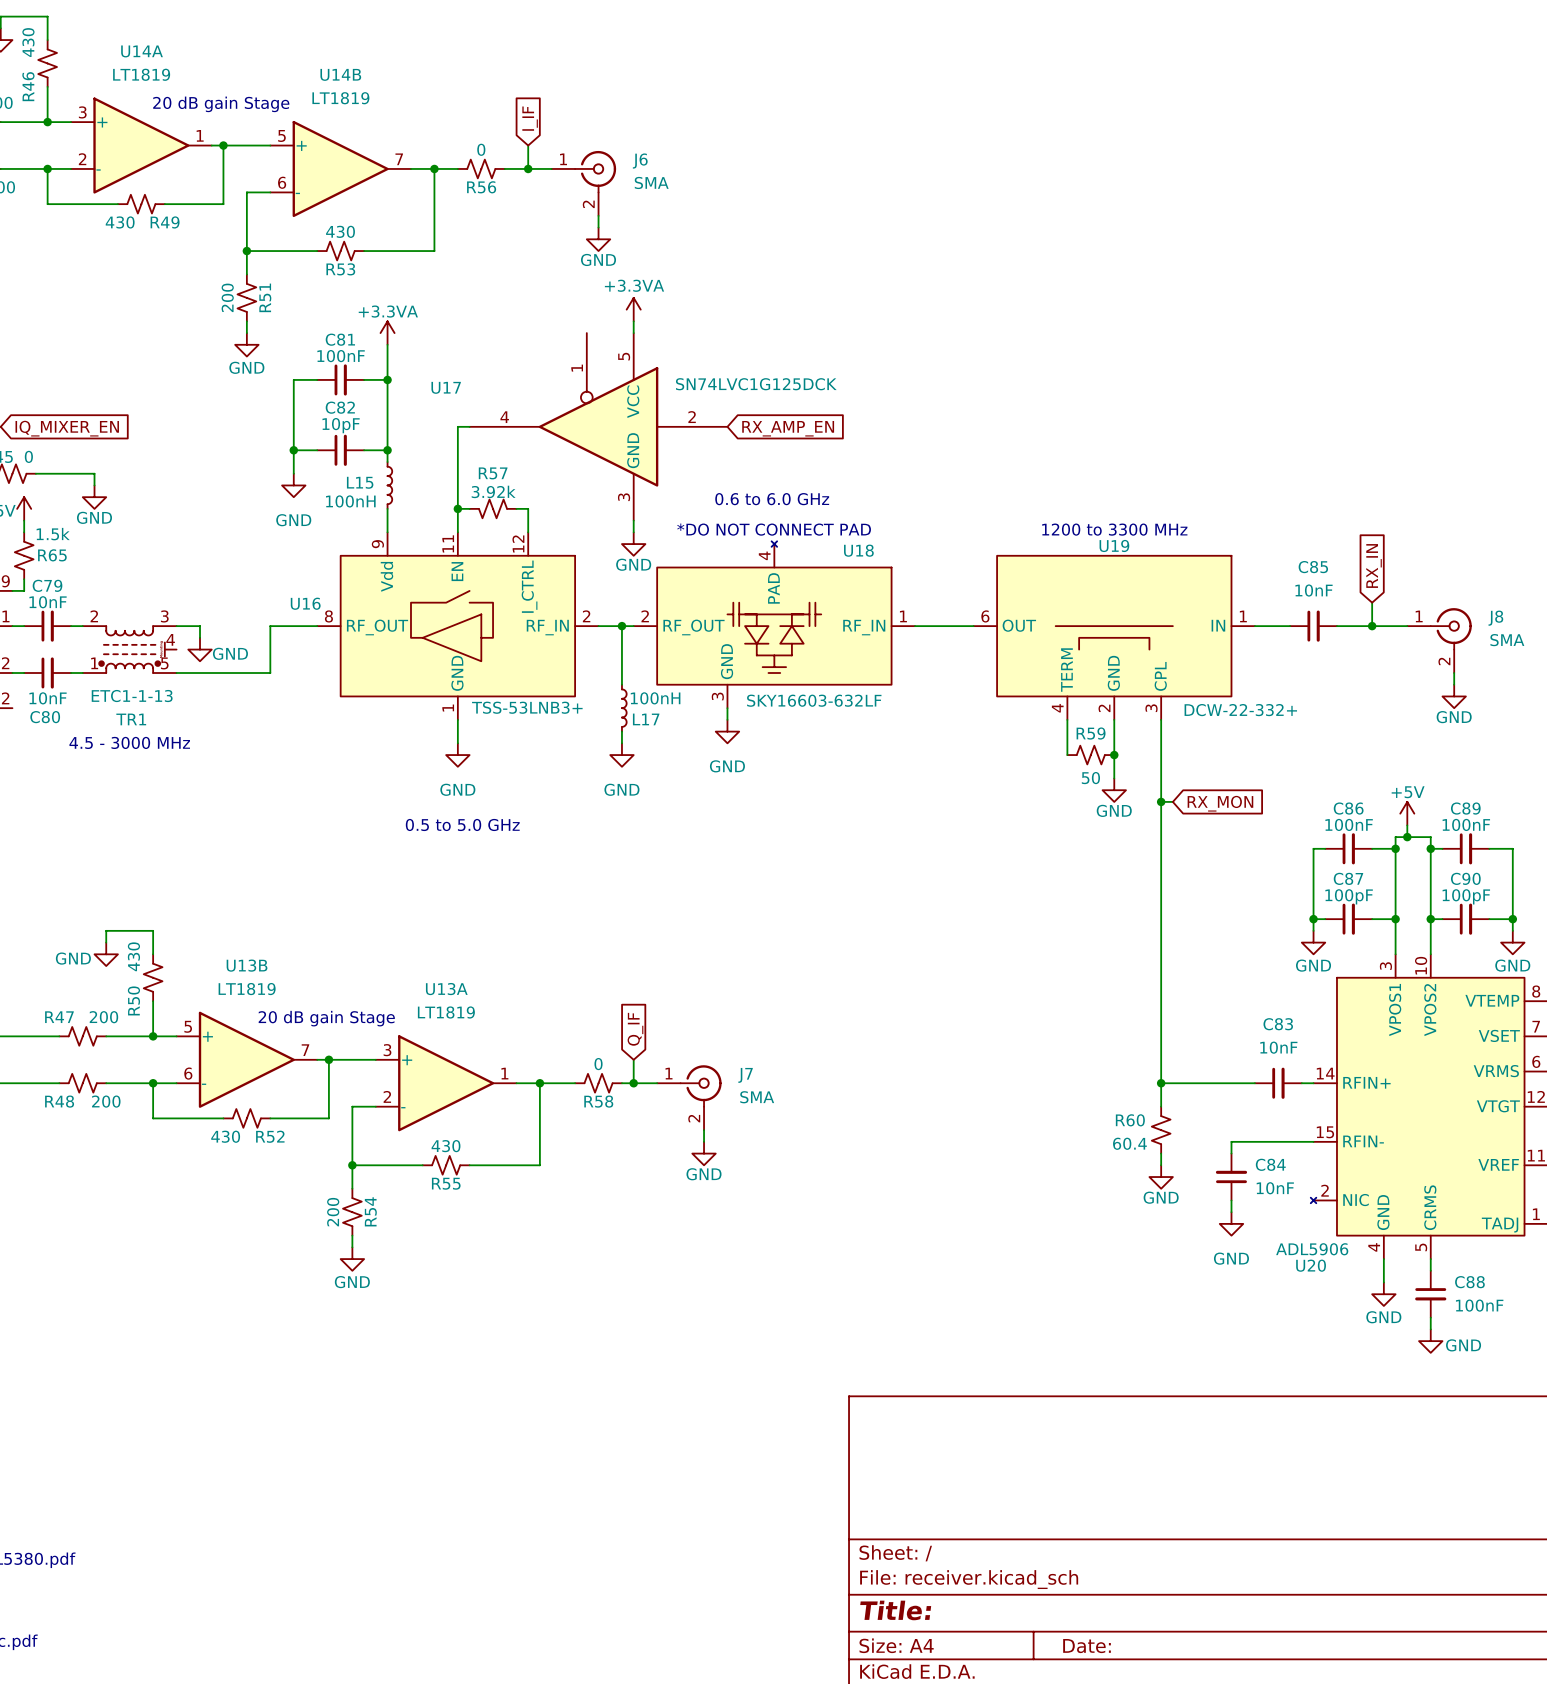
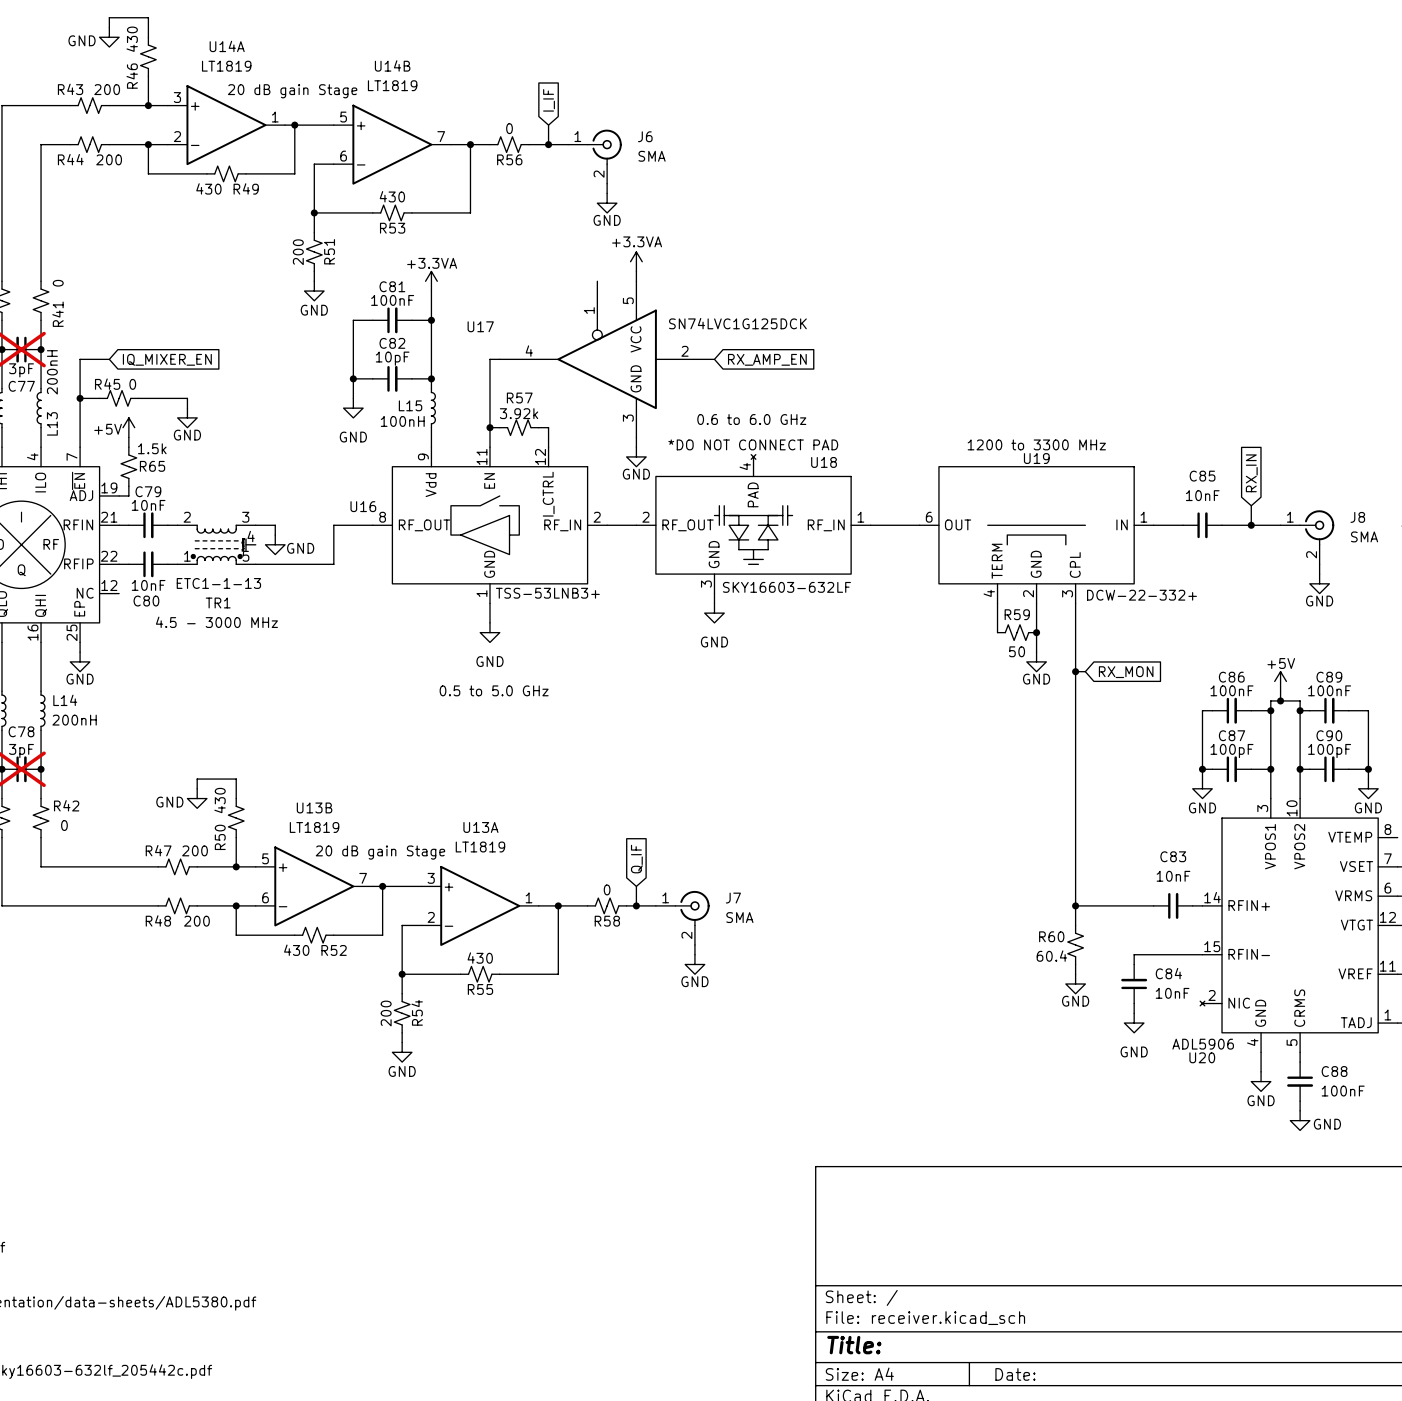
wire: (621, 626) (621, 684) -> none
junction: (621, 626) -> none
L17: 100nH (624, 708) -> none
wire: (621, 731) (621, 743) -> none
power symbol: GND (621, 755) -> none

